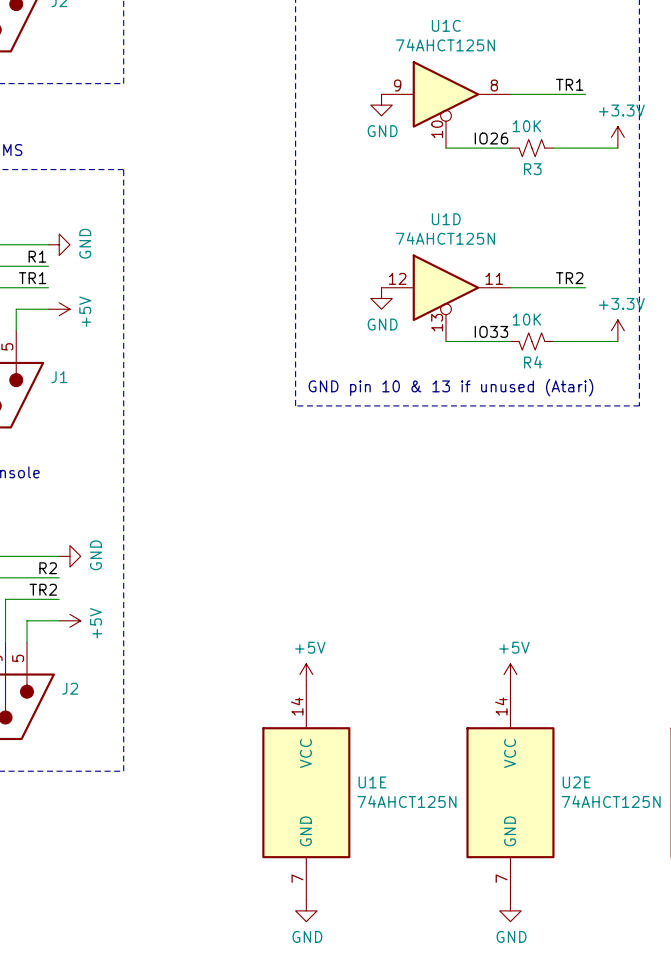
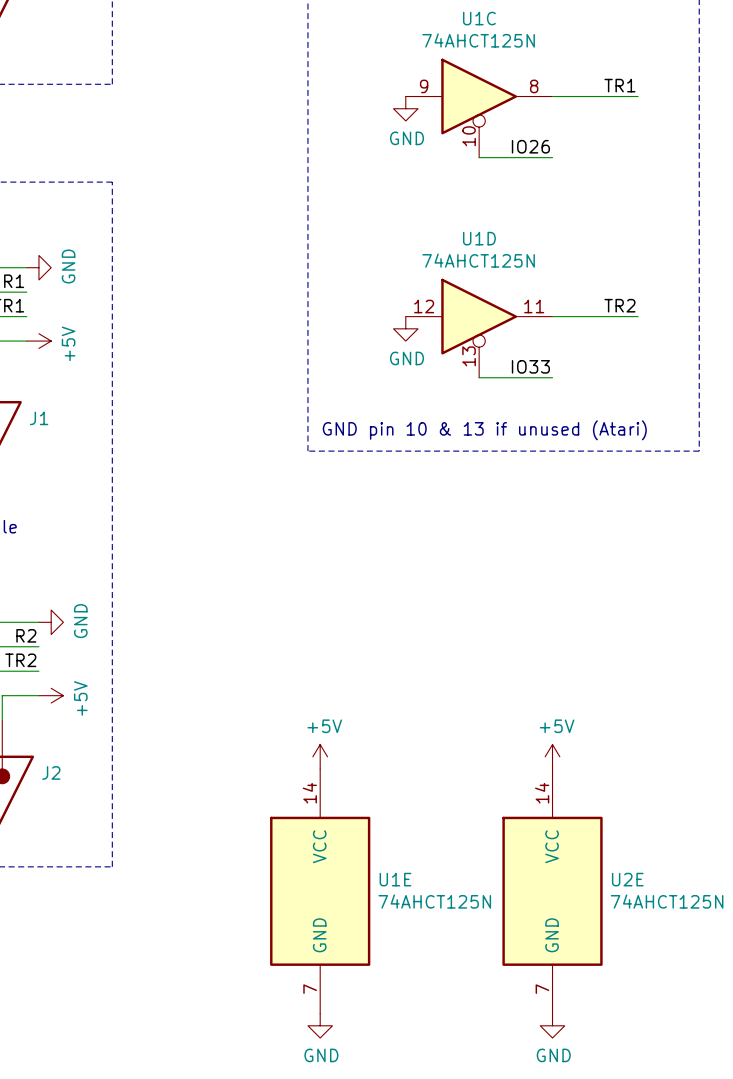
power symbol: +3.3V (617, 137) -> none
R3: 10K (531, 148) -> none
wire: (553, 148) (617, 148) -> none
power symbol: +3.3V (617, 330) -> none
R4: 10K (531, 341) -> none
wire: (553, 341) (617, 341) -> none

